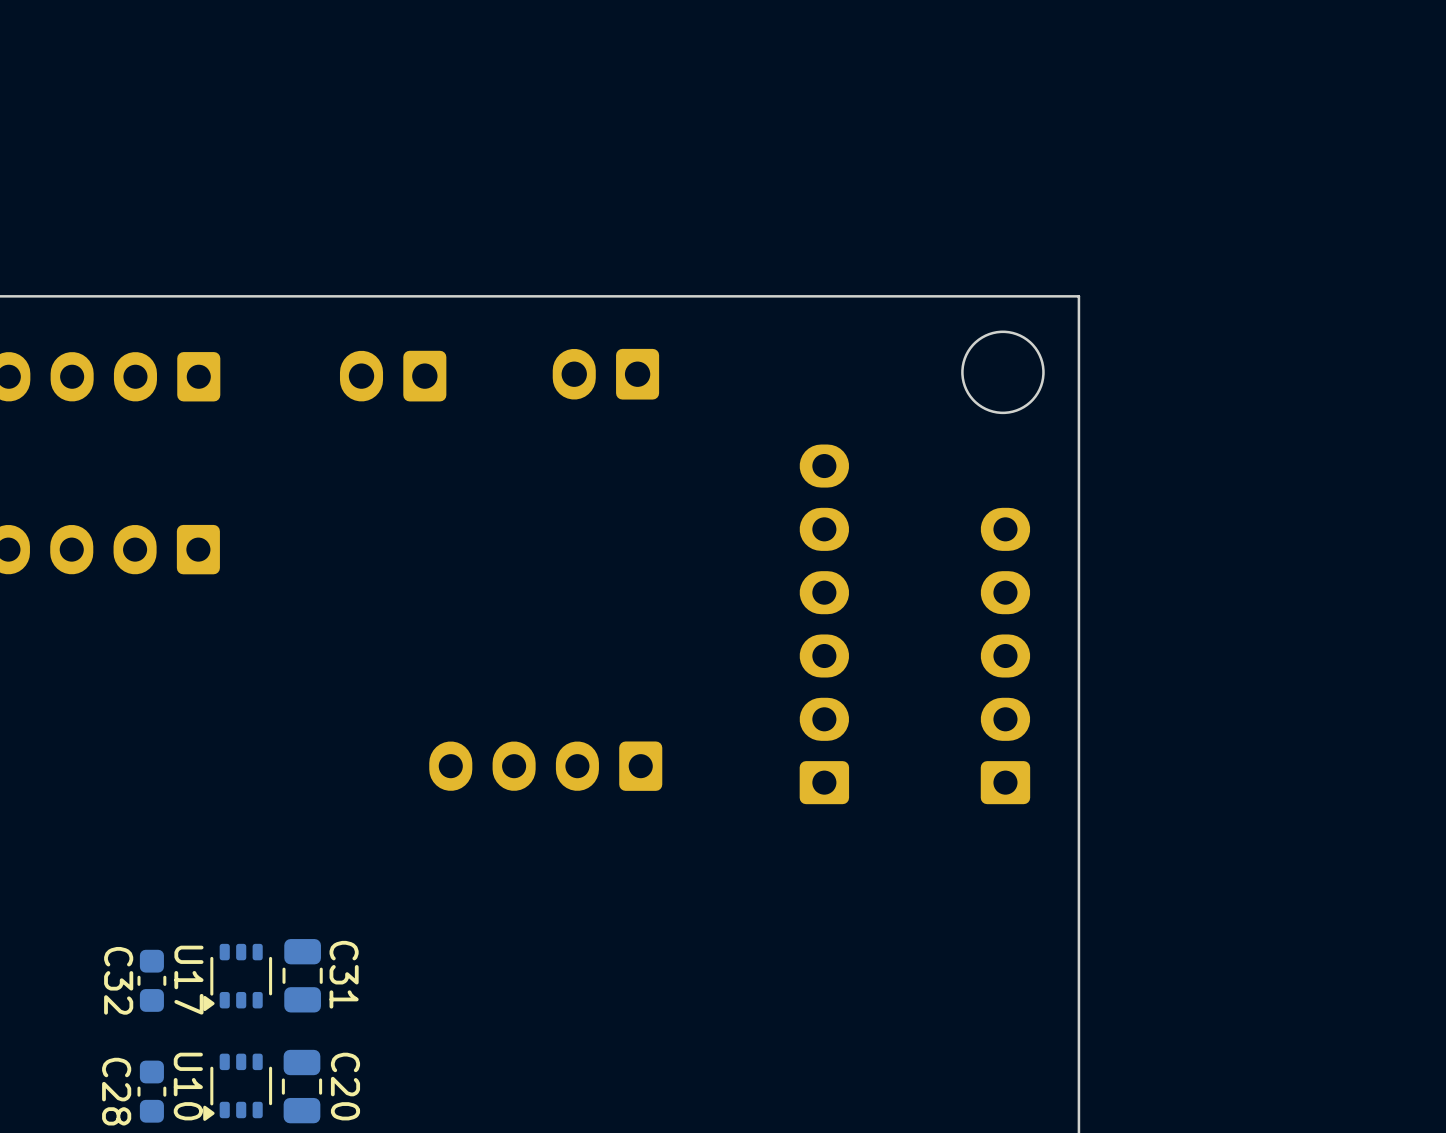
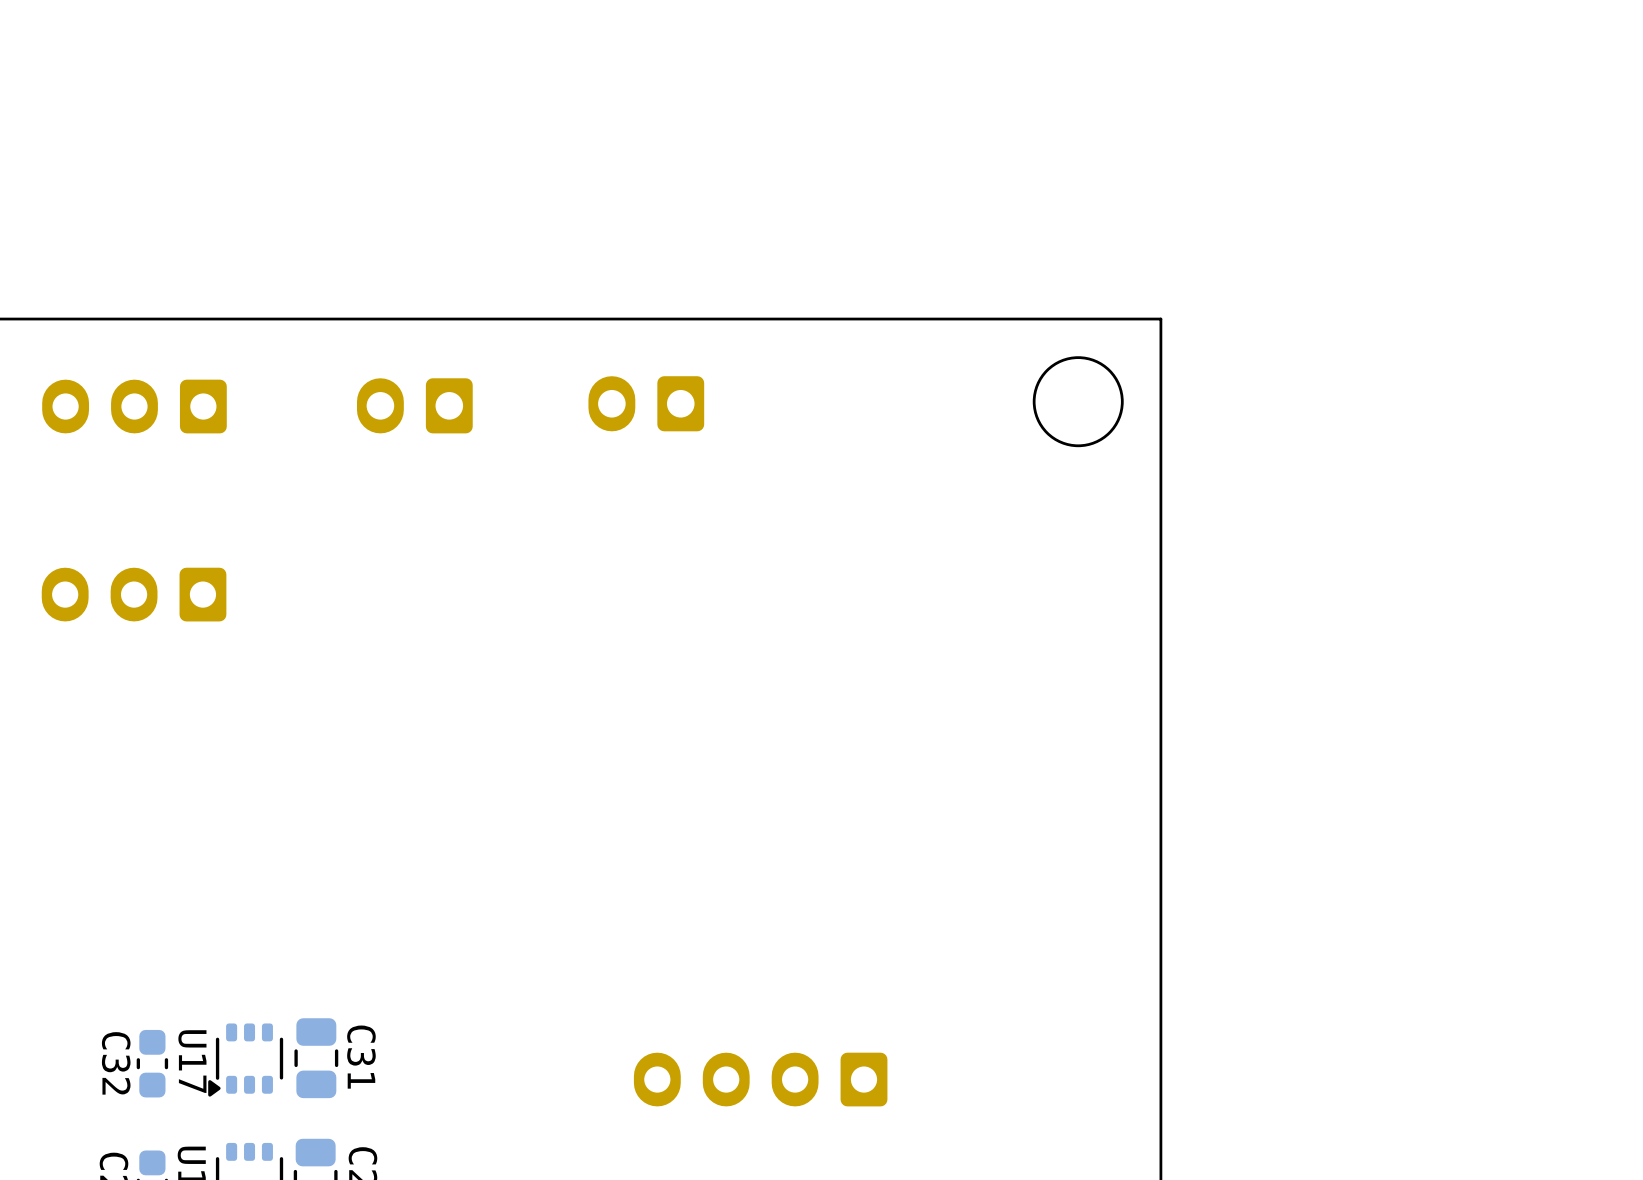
part: (824, 624) -> none
part: (1005, 655) -> none
part position: (545, 766) -> (760, 1079)

